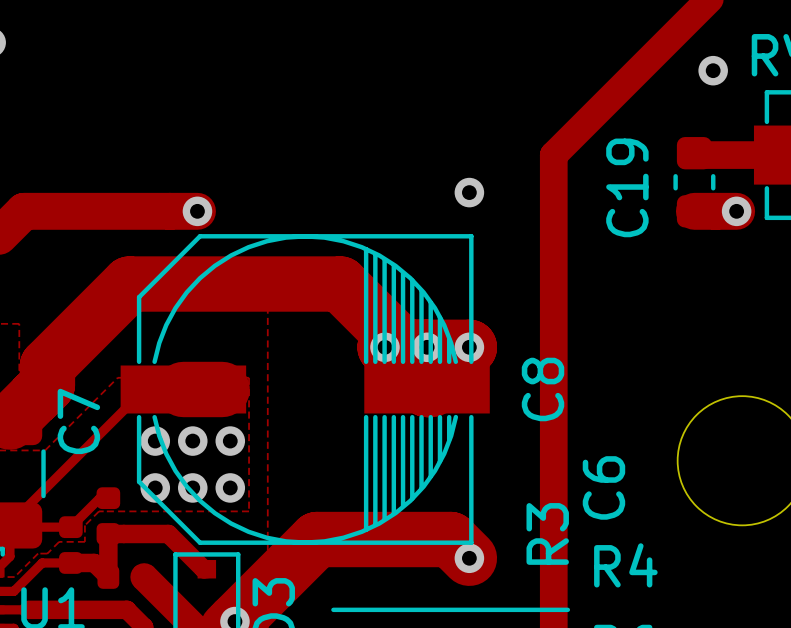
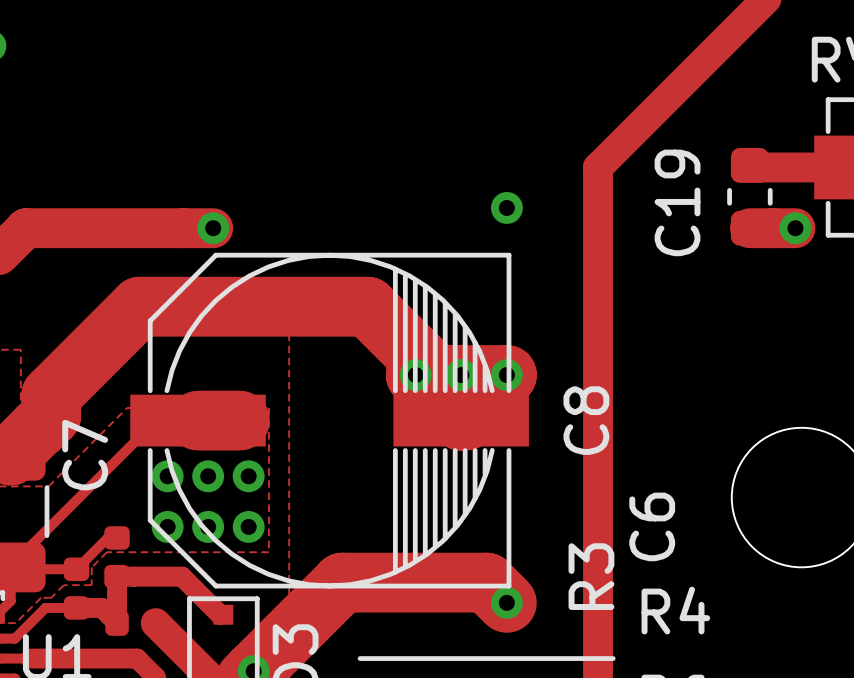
via: (713, 70) -> none

